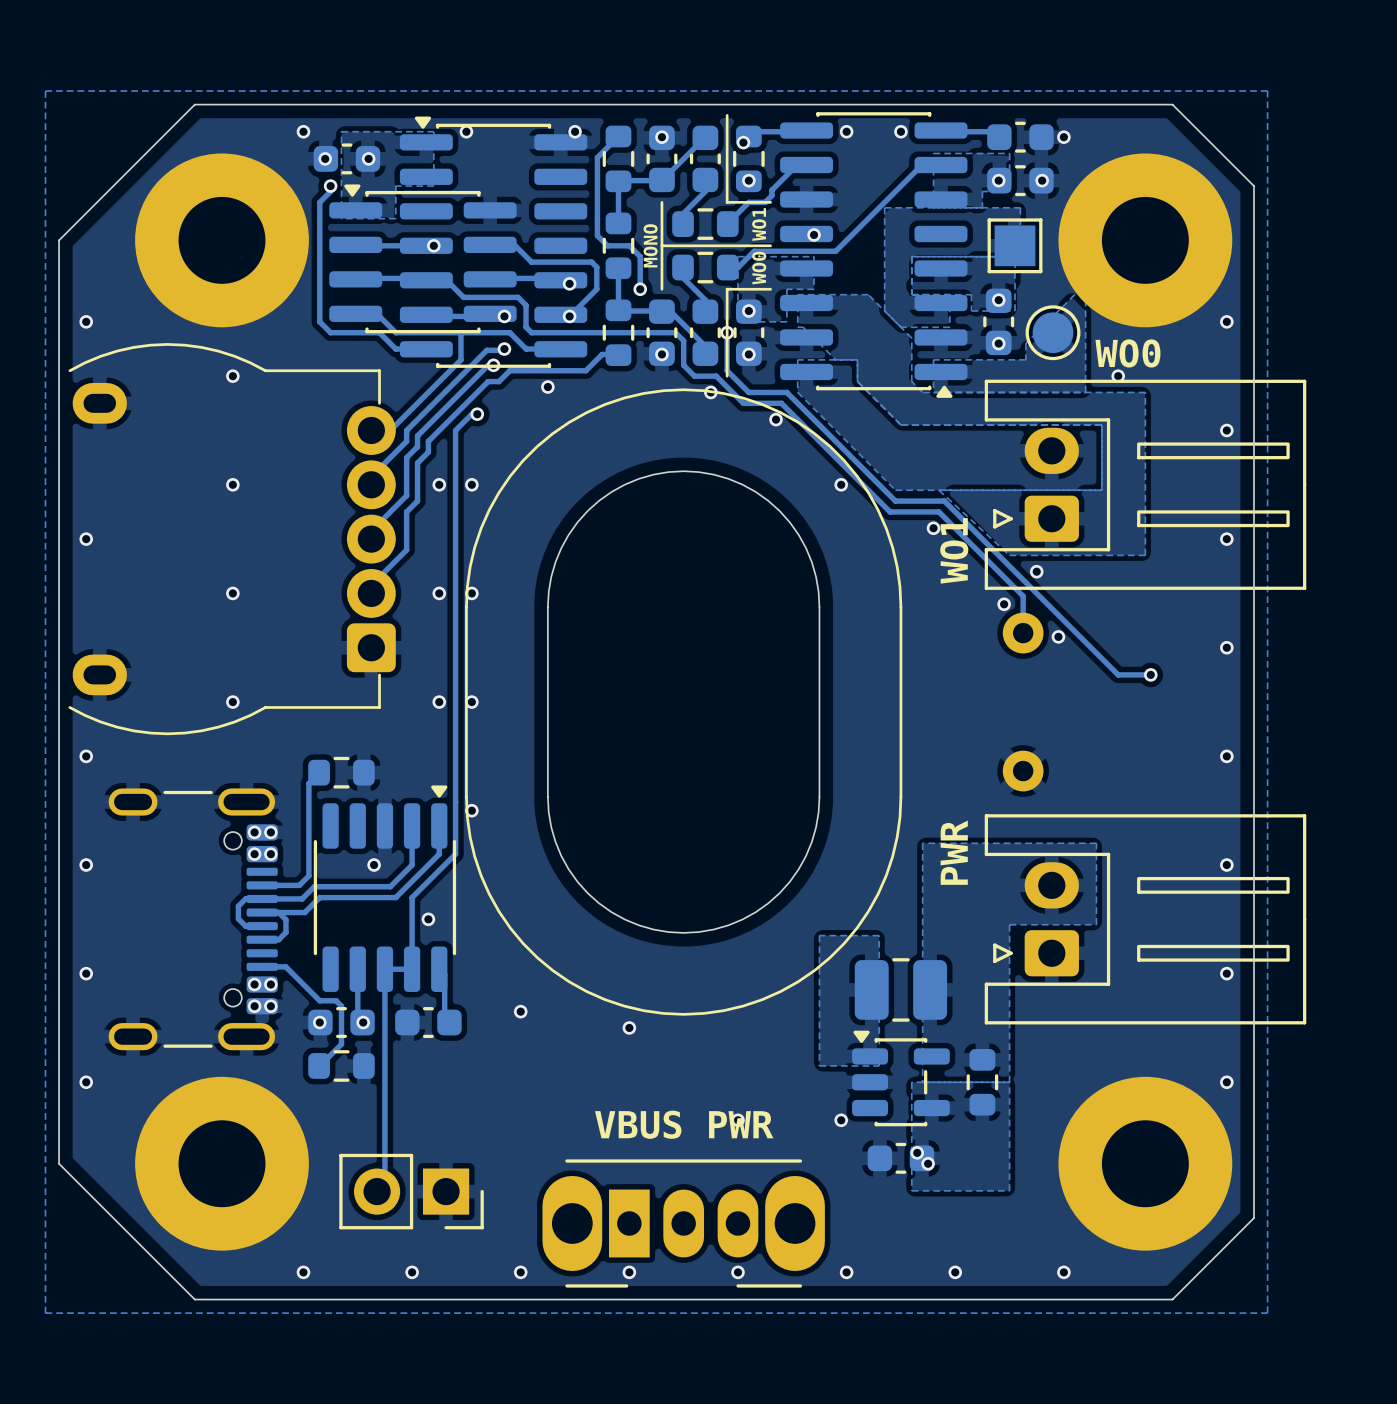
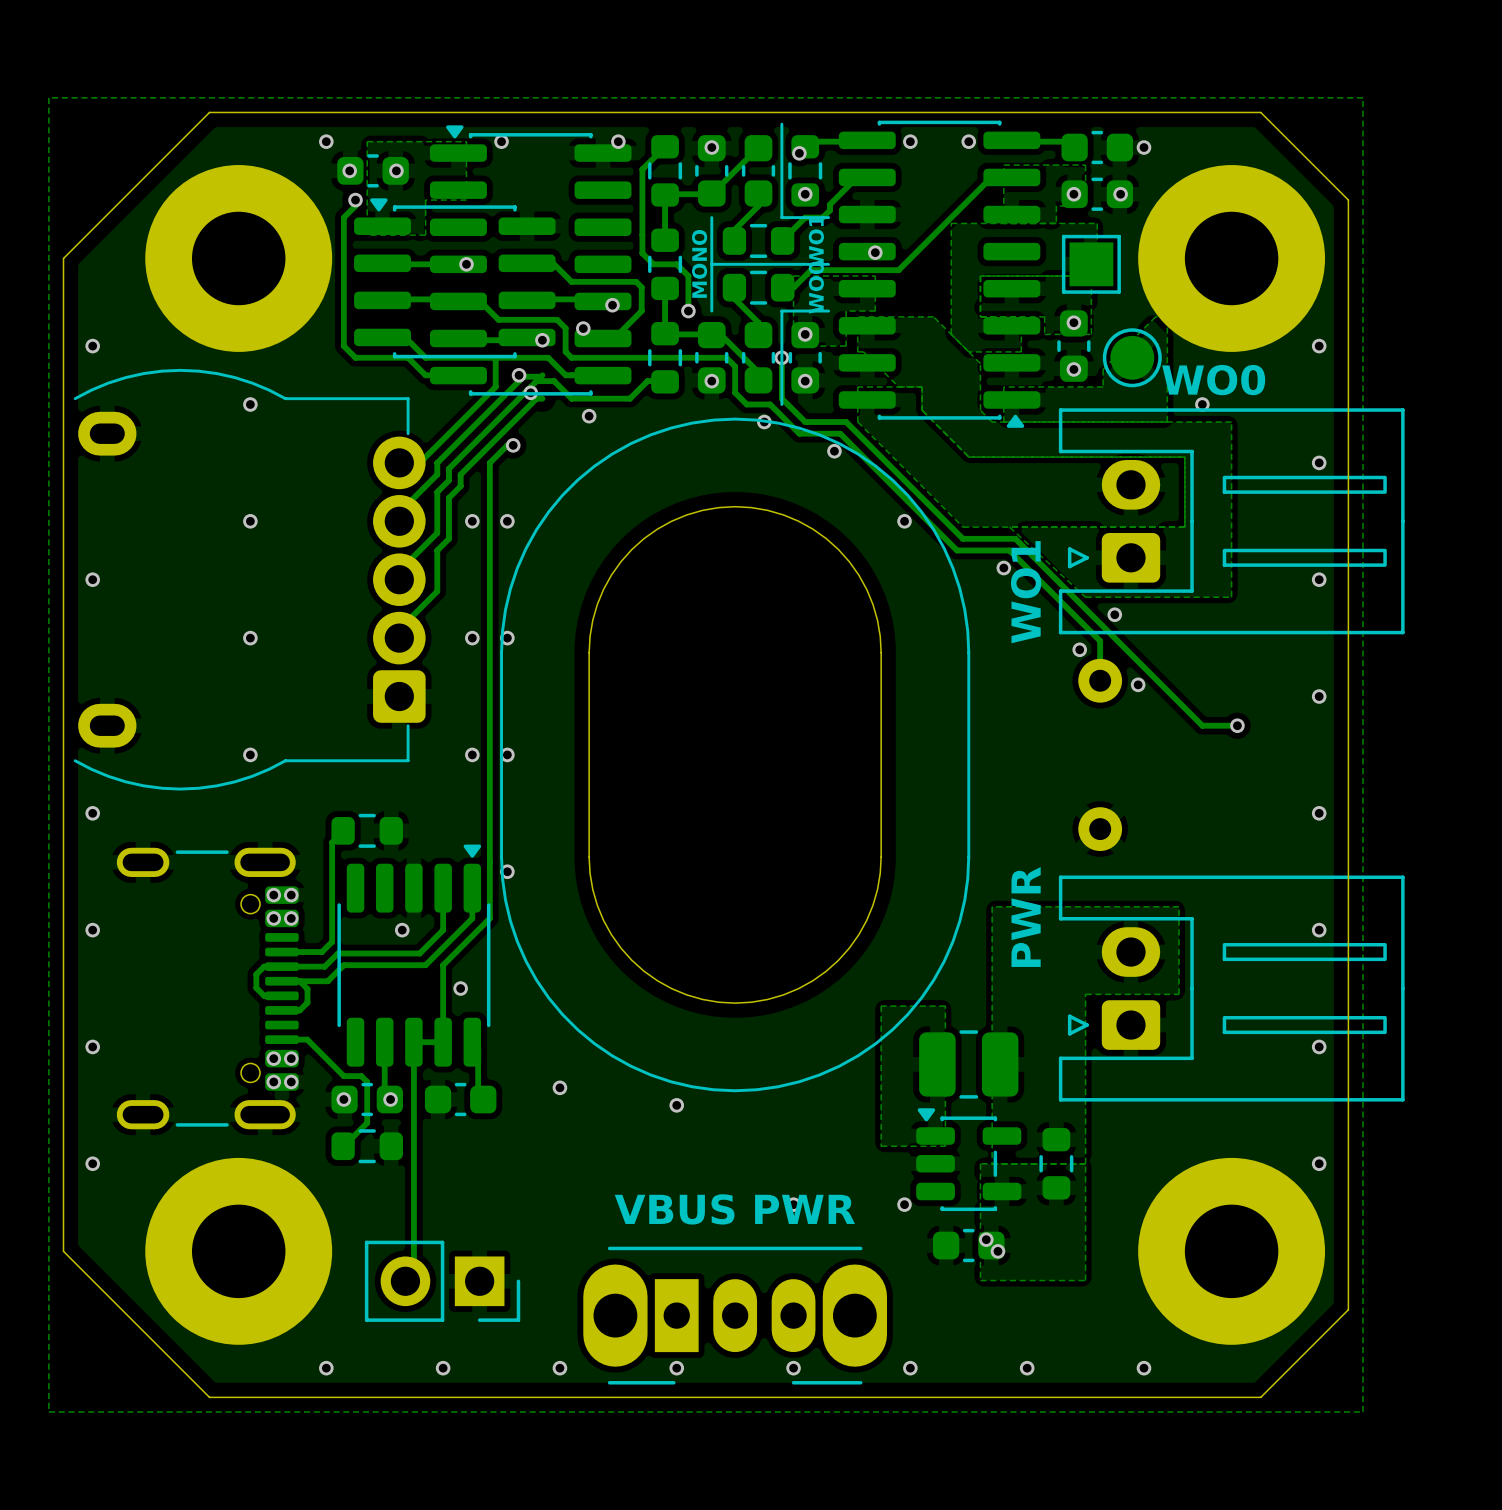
via: none -> (583, 328)
via: (569, 316) -> none
via position: (504, 349) -> (519, 375)
track: none -> (542, 398) (536, 398) (524, 410)
track: (531, 370) (509, 370) (499, 381) (488, 381) -> (571, 398) (554, 381) (536, 381) (524, 392)

